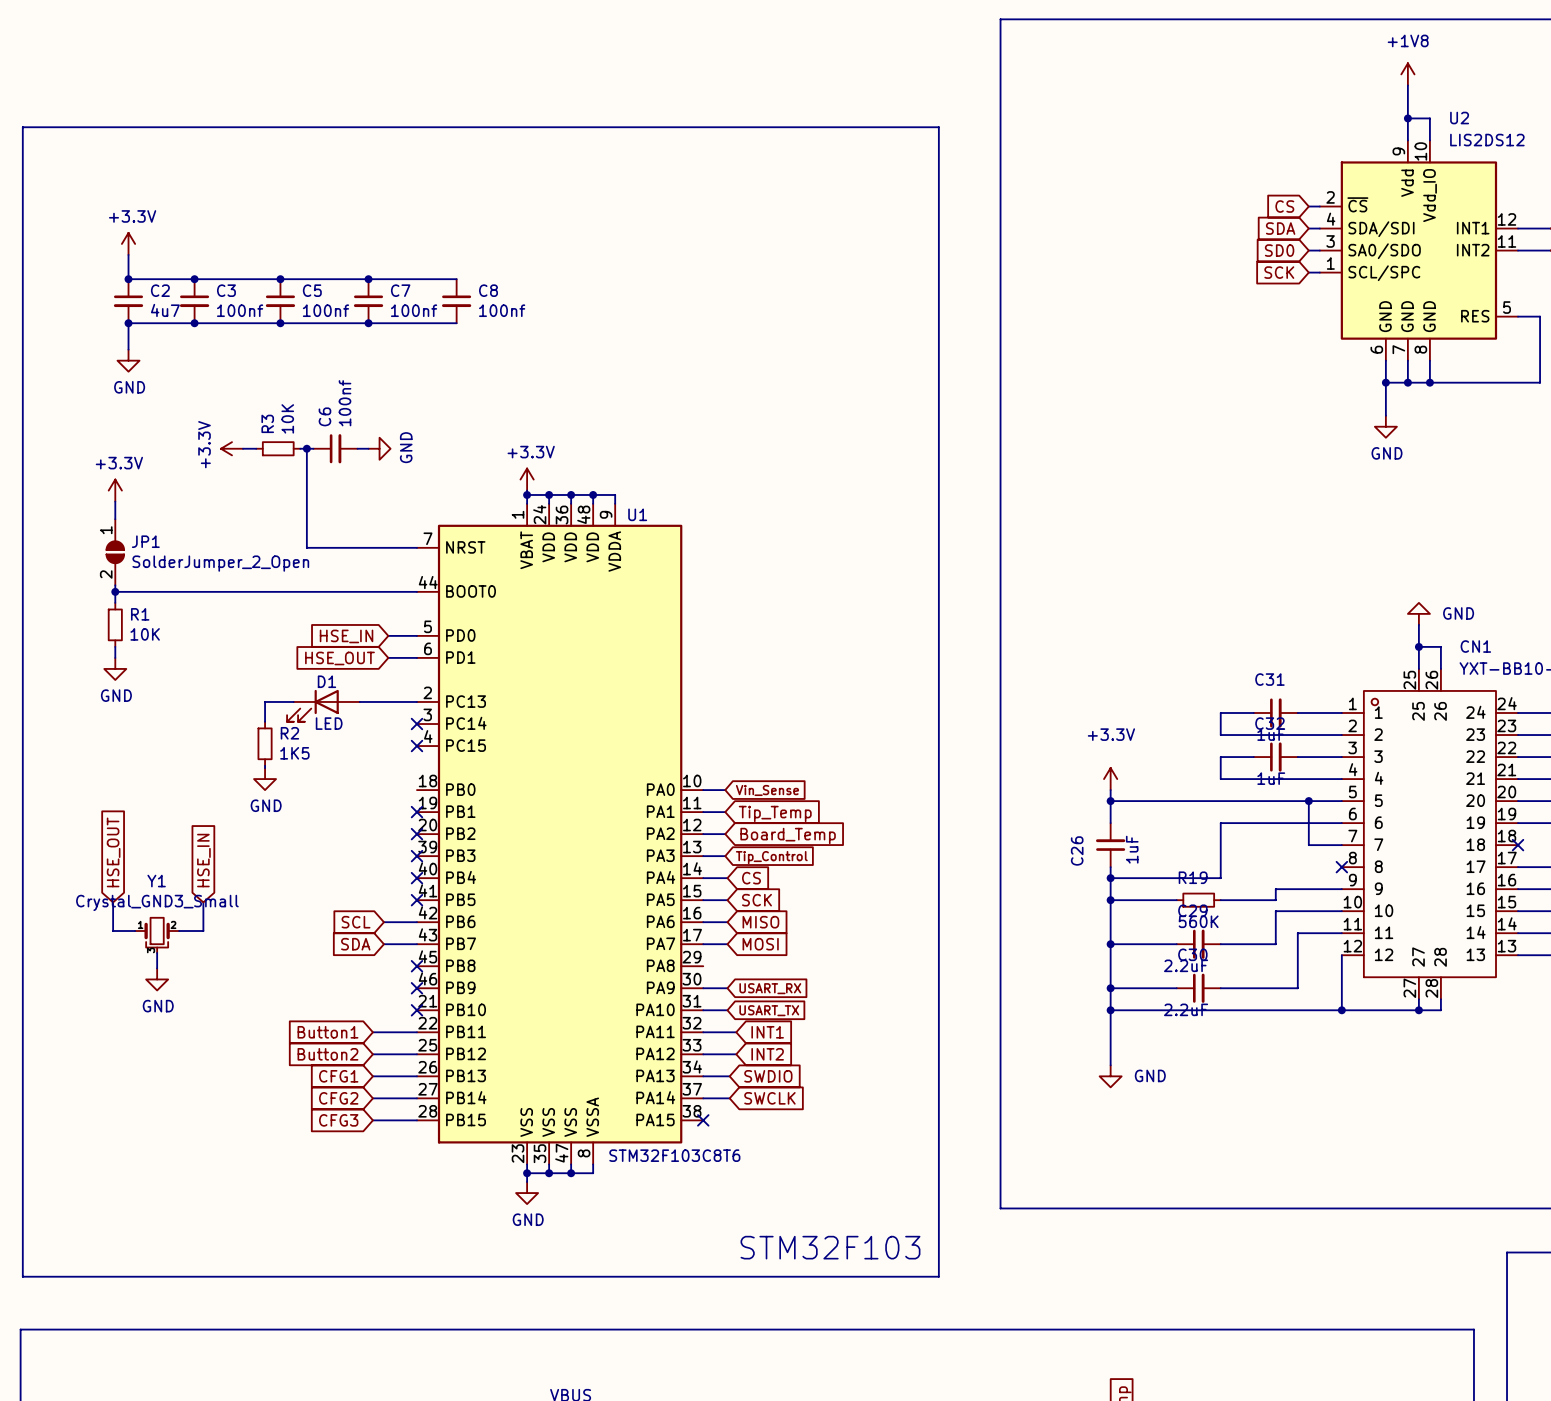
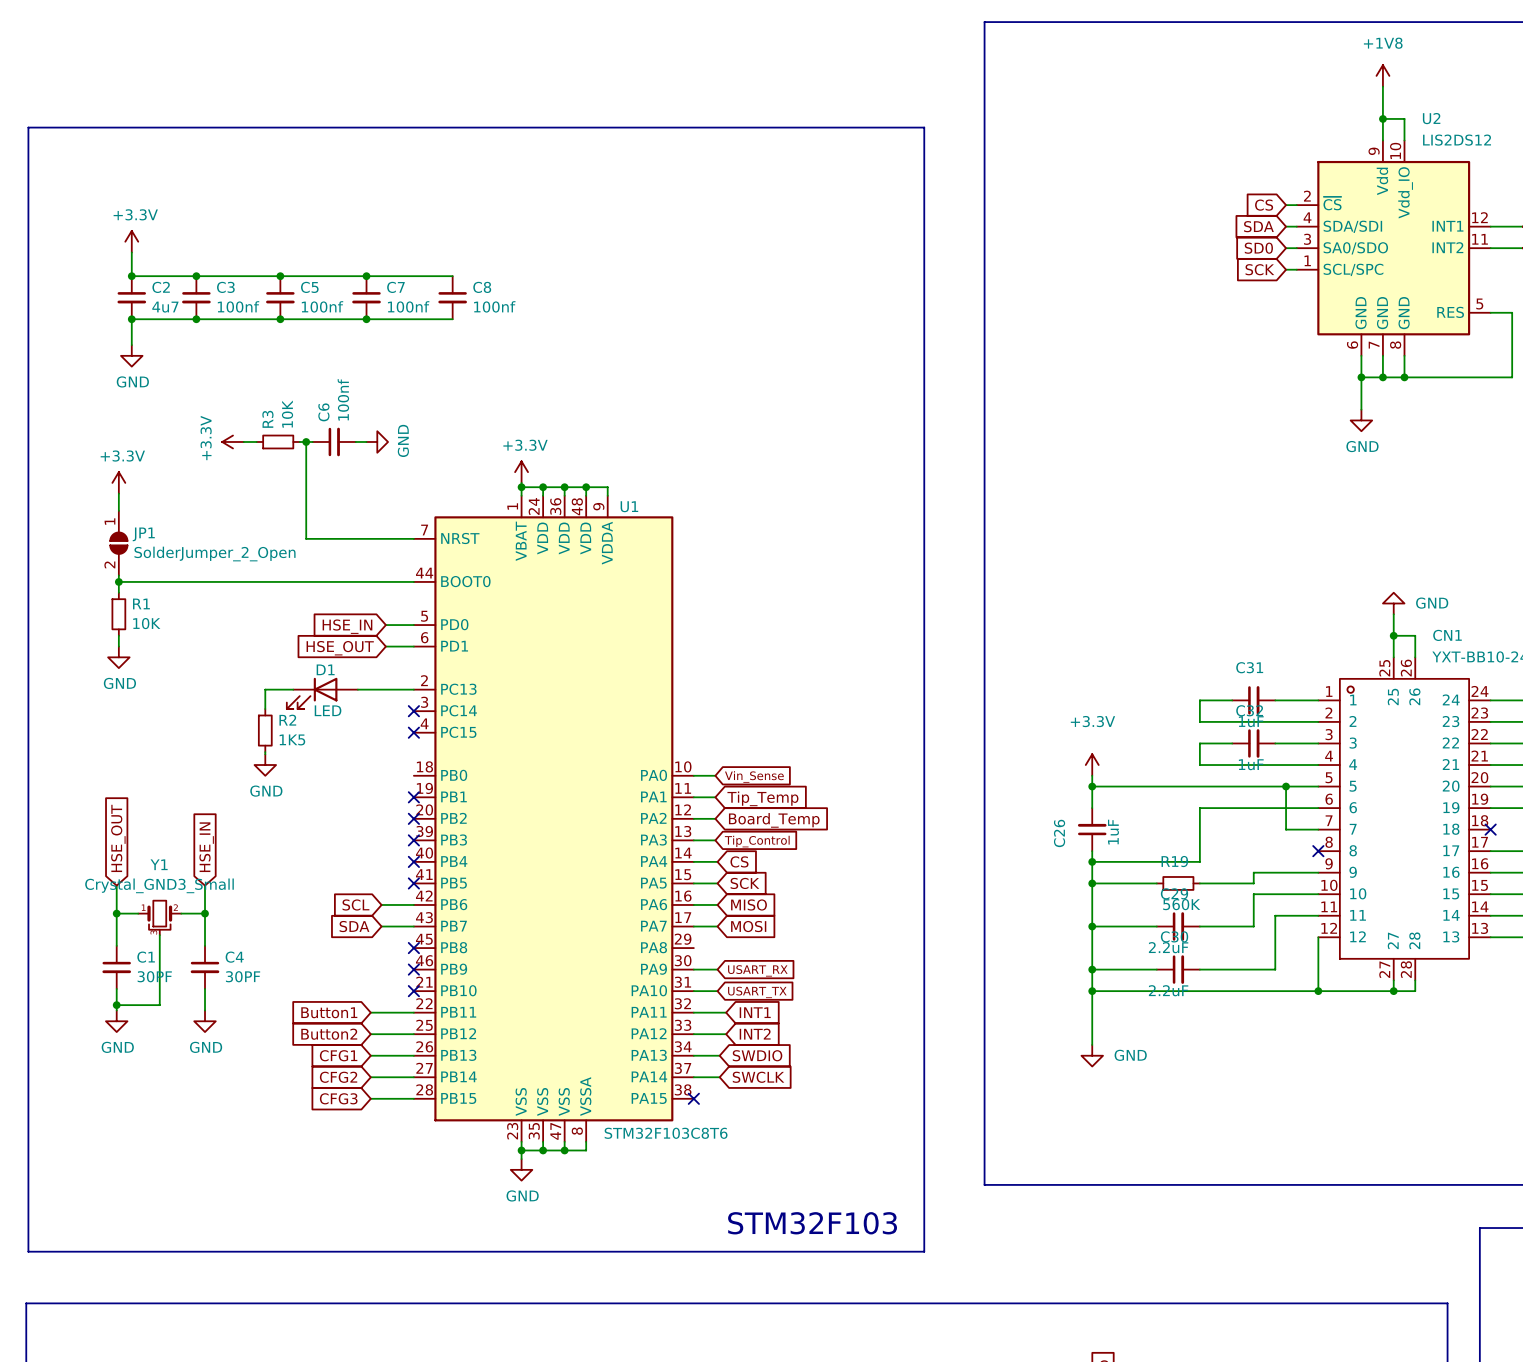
wire: none -> (116, 913) (116, 945)
junction: none -> (116, 913)
wire: none -> (205, 913) (205, 945)
junction: none -> (205, 913)
wire: none -> (159, 950) (159, 1005) (116, 1005)
power symbol: GND (157, 979) -> none
C1: none -> 30PF (116, 967)
C4: none -> 30PF (205, 967)
wire: none -> (116, 988) (116, 1010)
wire: none -> (205, 988) (205, 1010)
junction: none -> (116, 1005)
power symbol: none -> GND (116, 1021)
power symbol: none -> GND (205, 1021)

